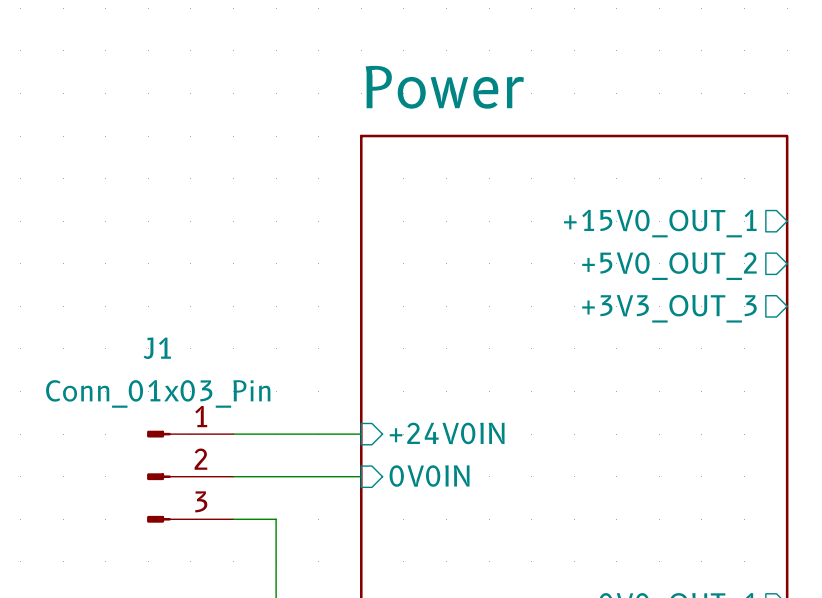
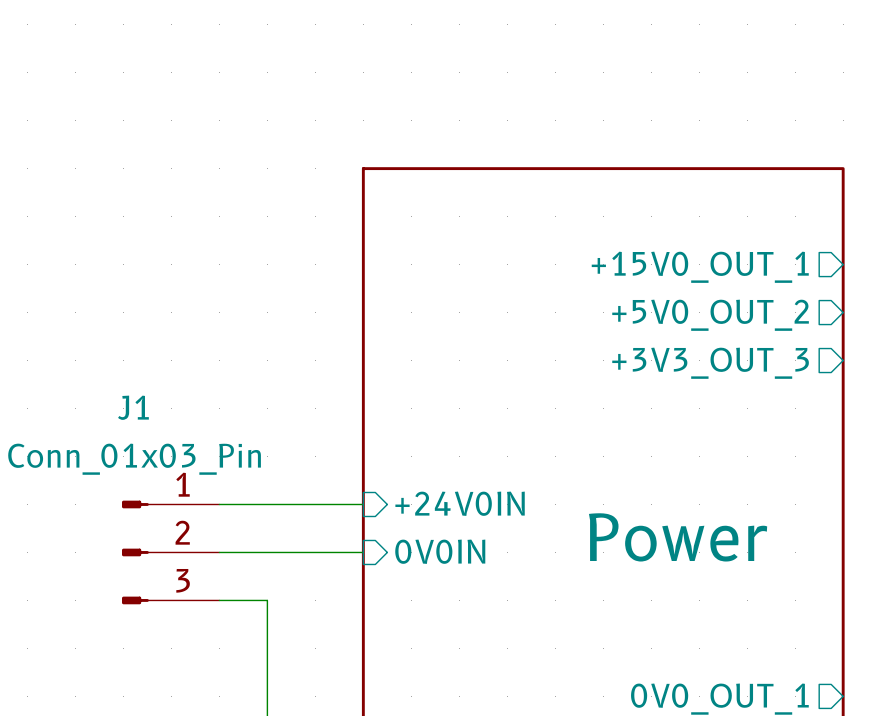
sheet Power name position: Power (444, 87) -> Power (678, 537)

